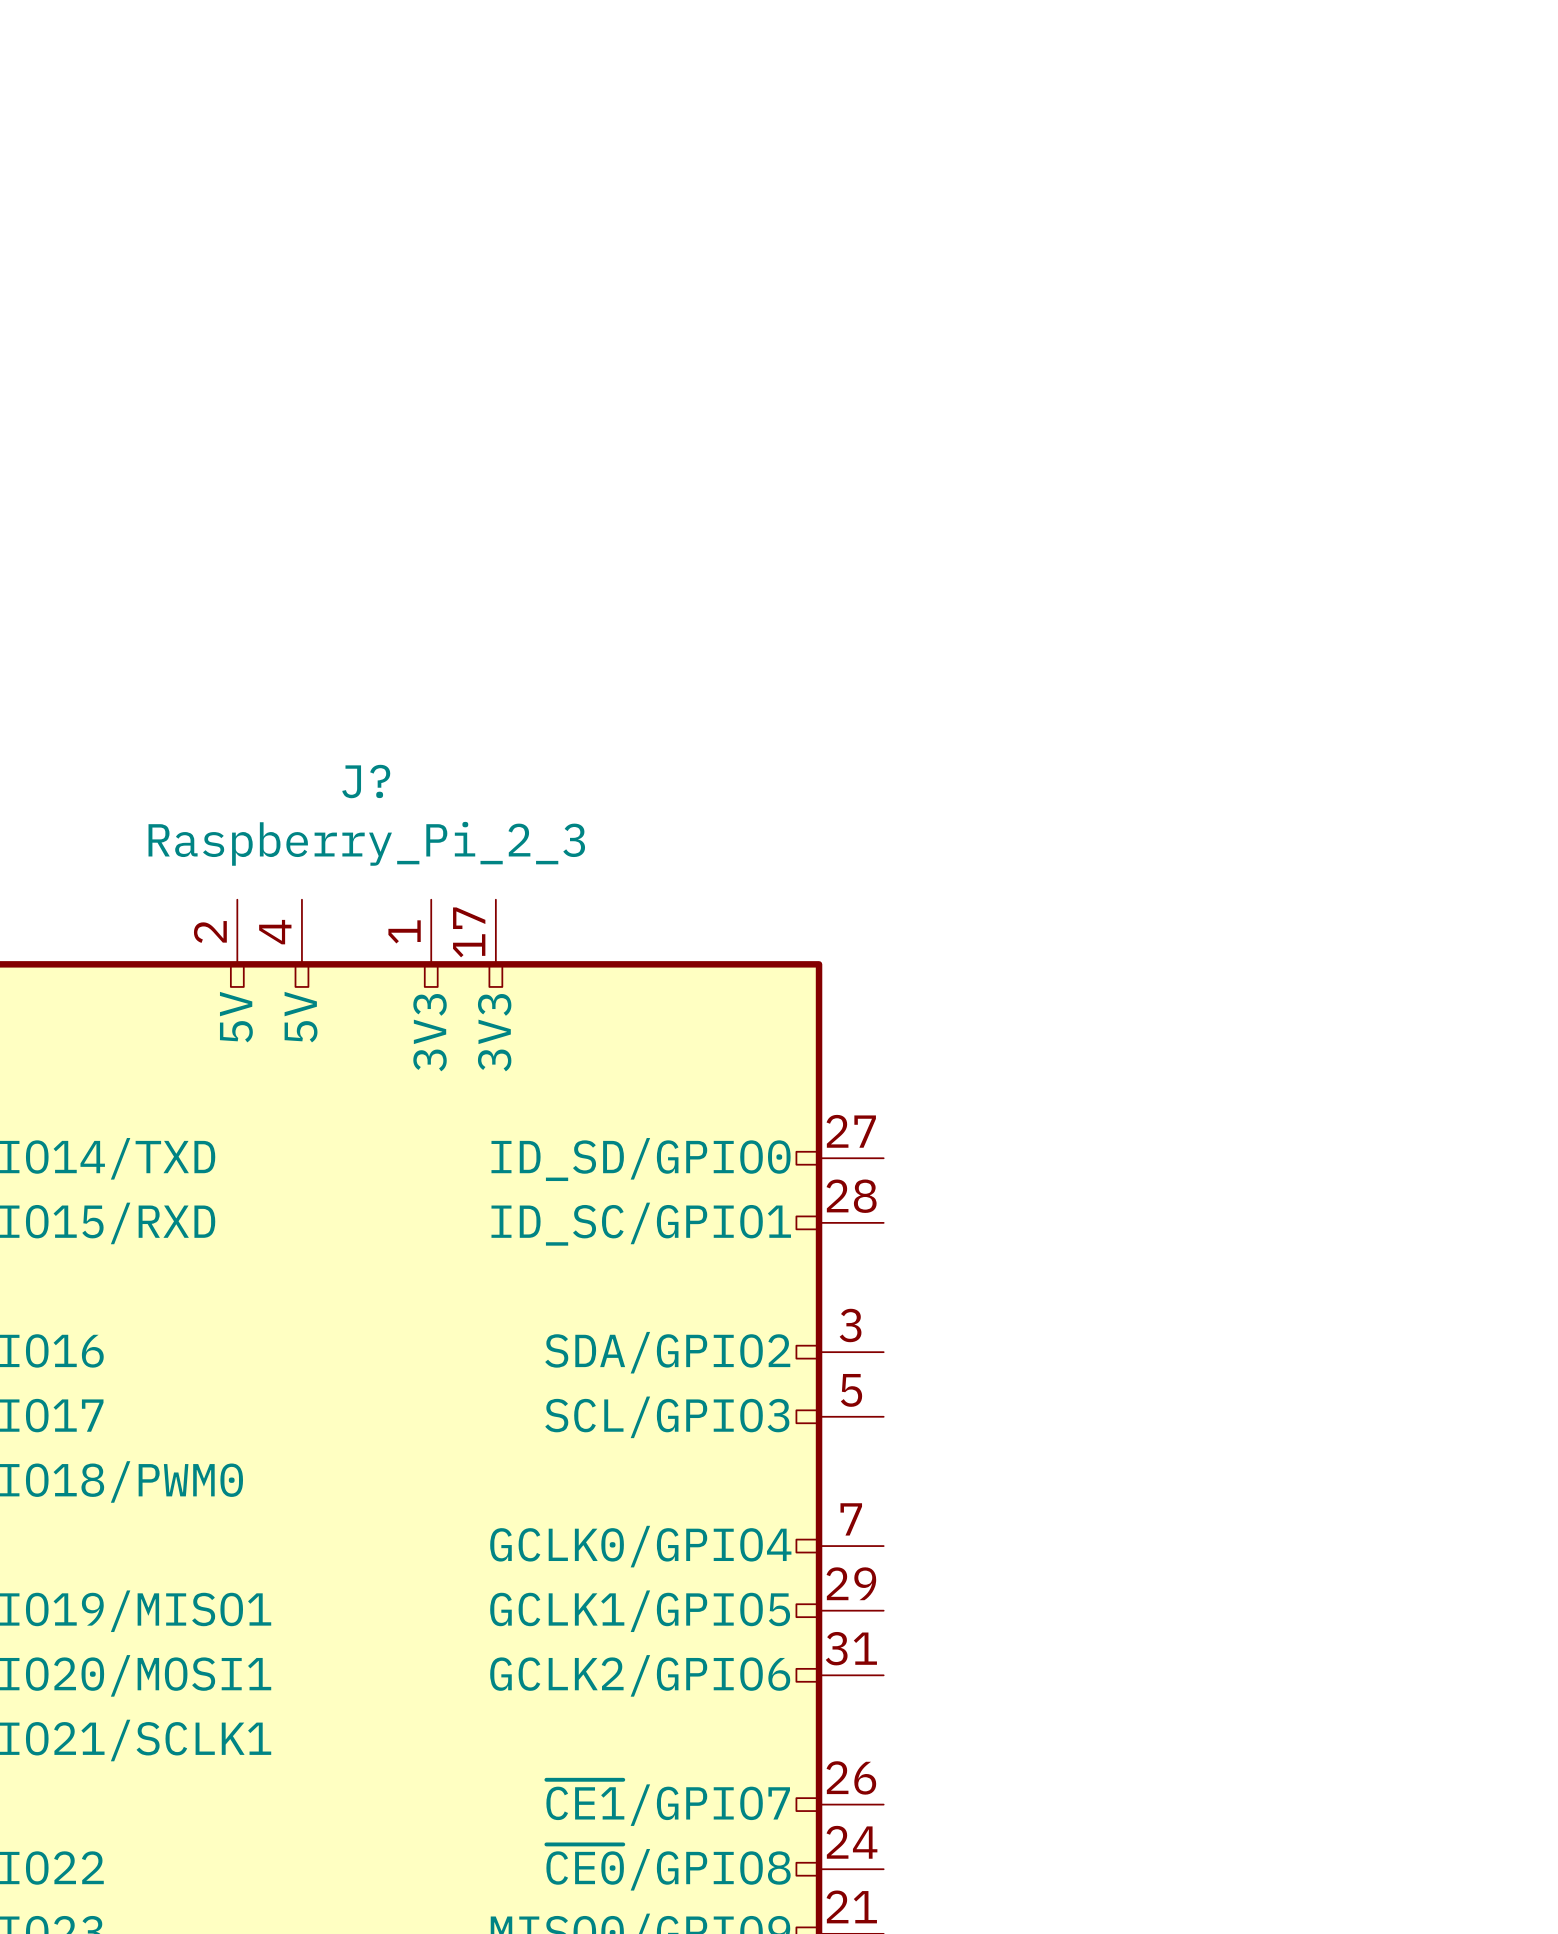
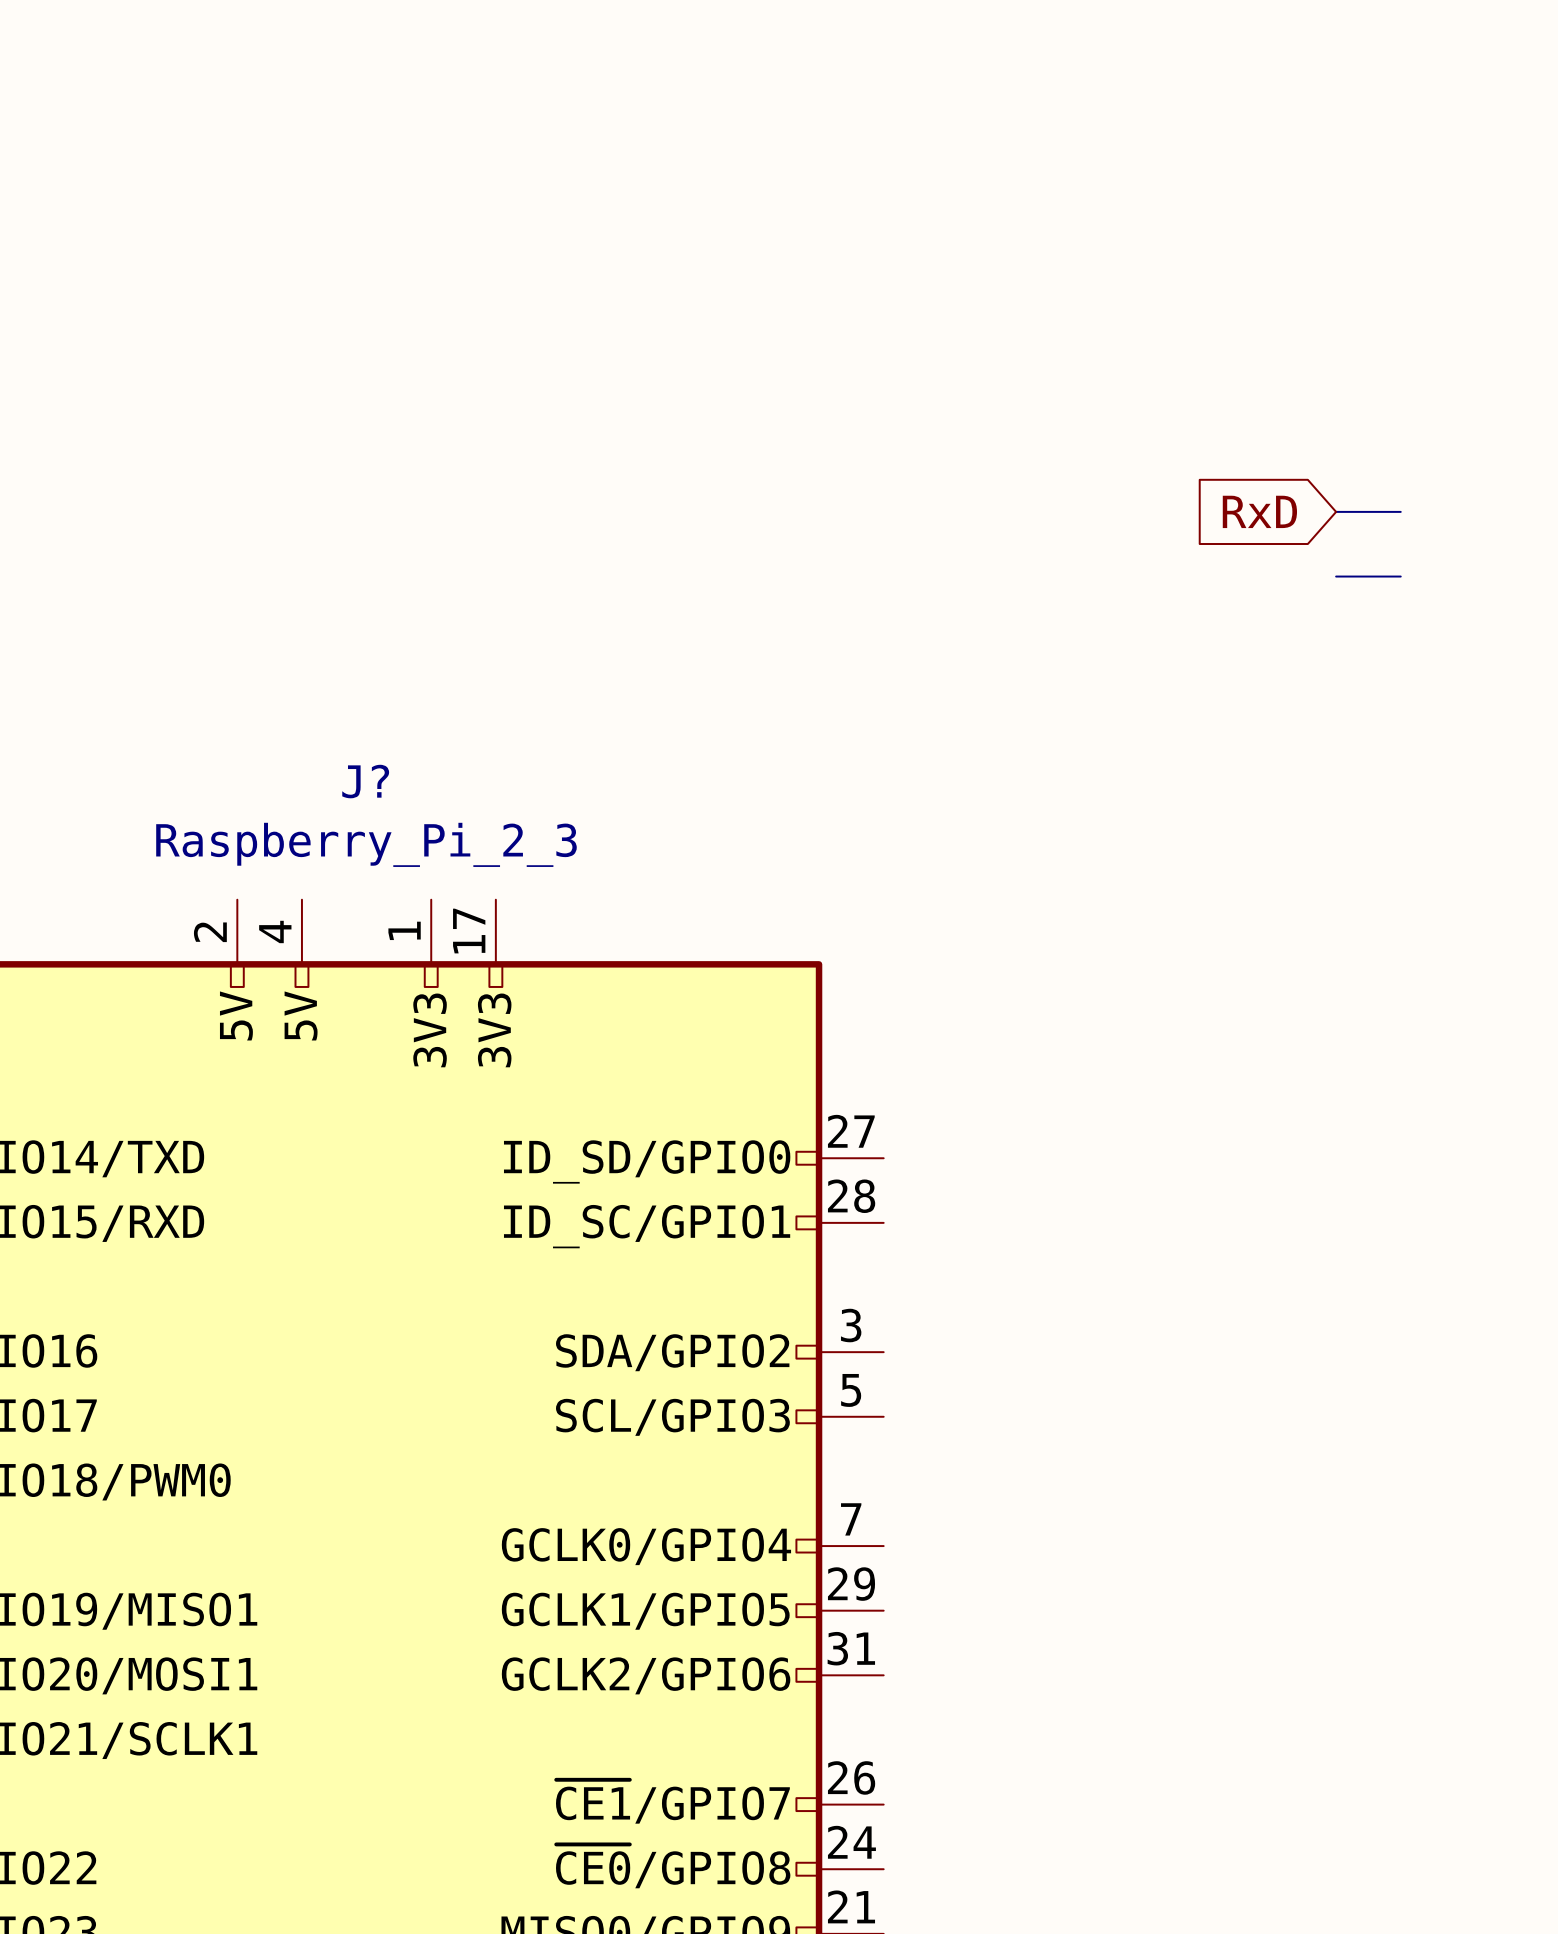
global label: none -> RxD (1259, 511)
wire: none -> (1336, 511) (1400, 511)
wire: none -> (1336, 576) (1400, 576)

